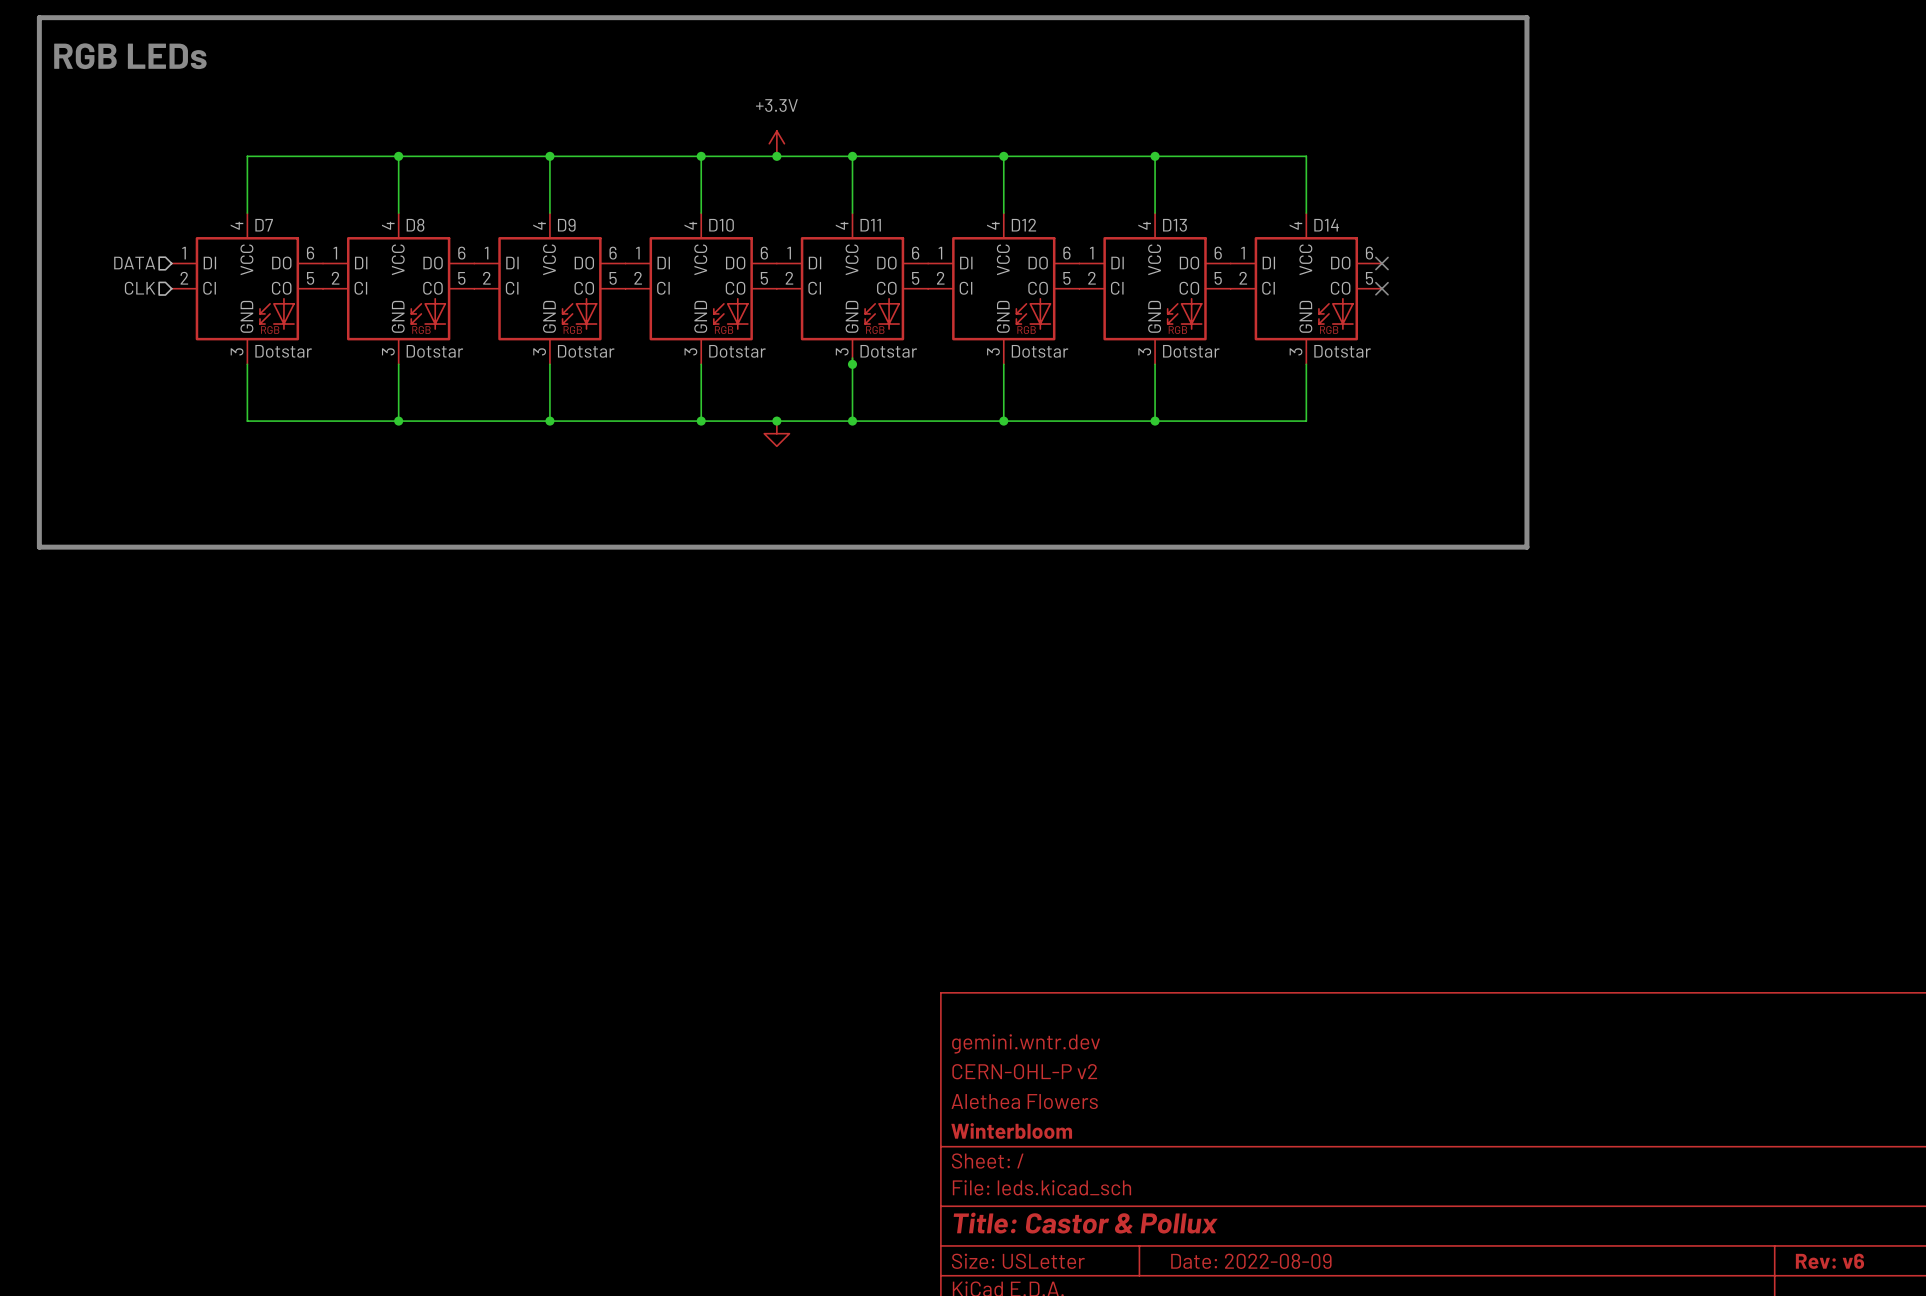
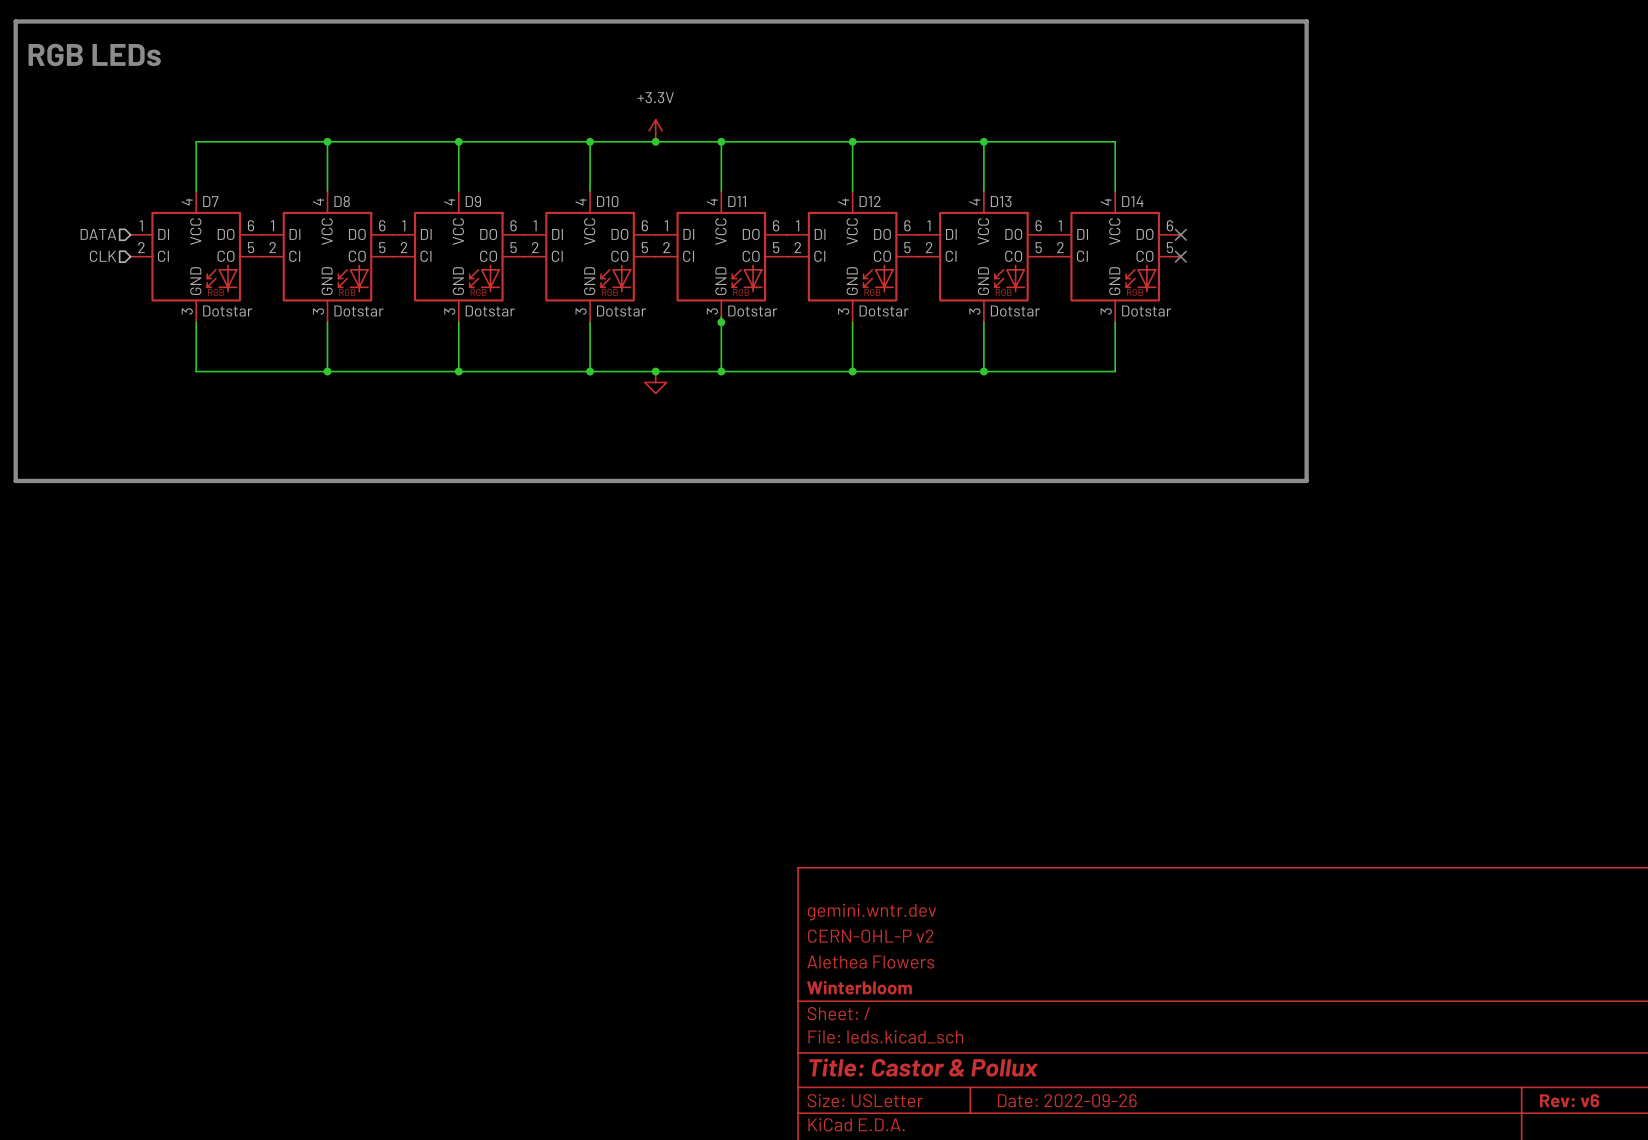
title block: Date: 2022-08-09 (1251, 1261) -> Date: 2022-09-26 (1067, 1100)

